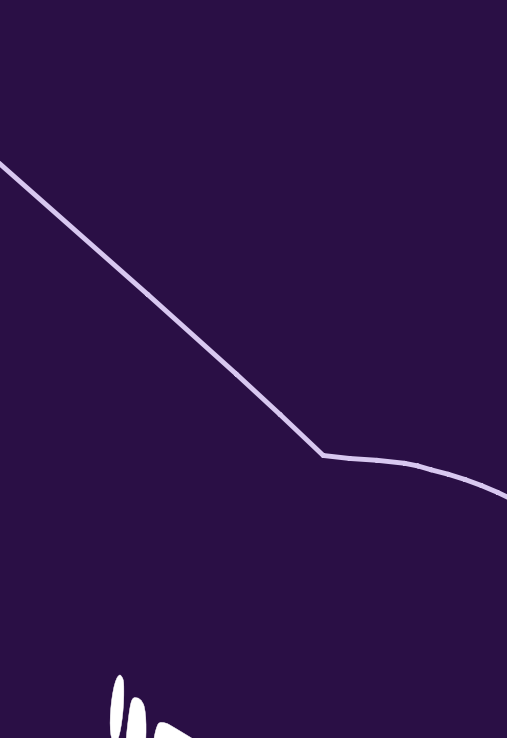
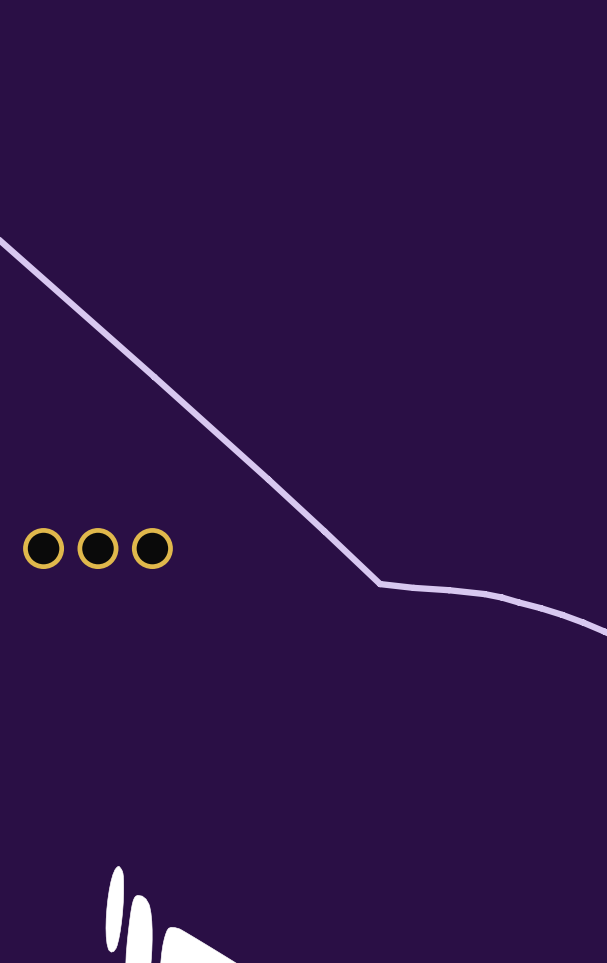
part: none -> (97, 548)

